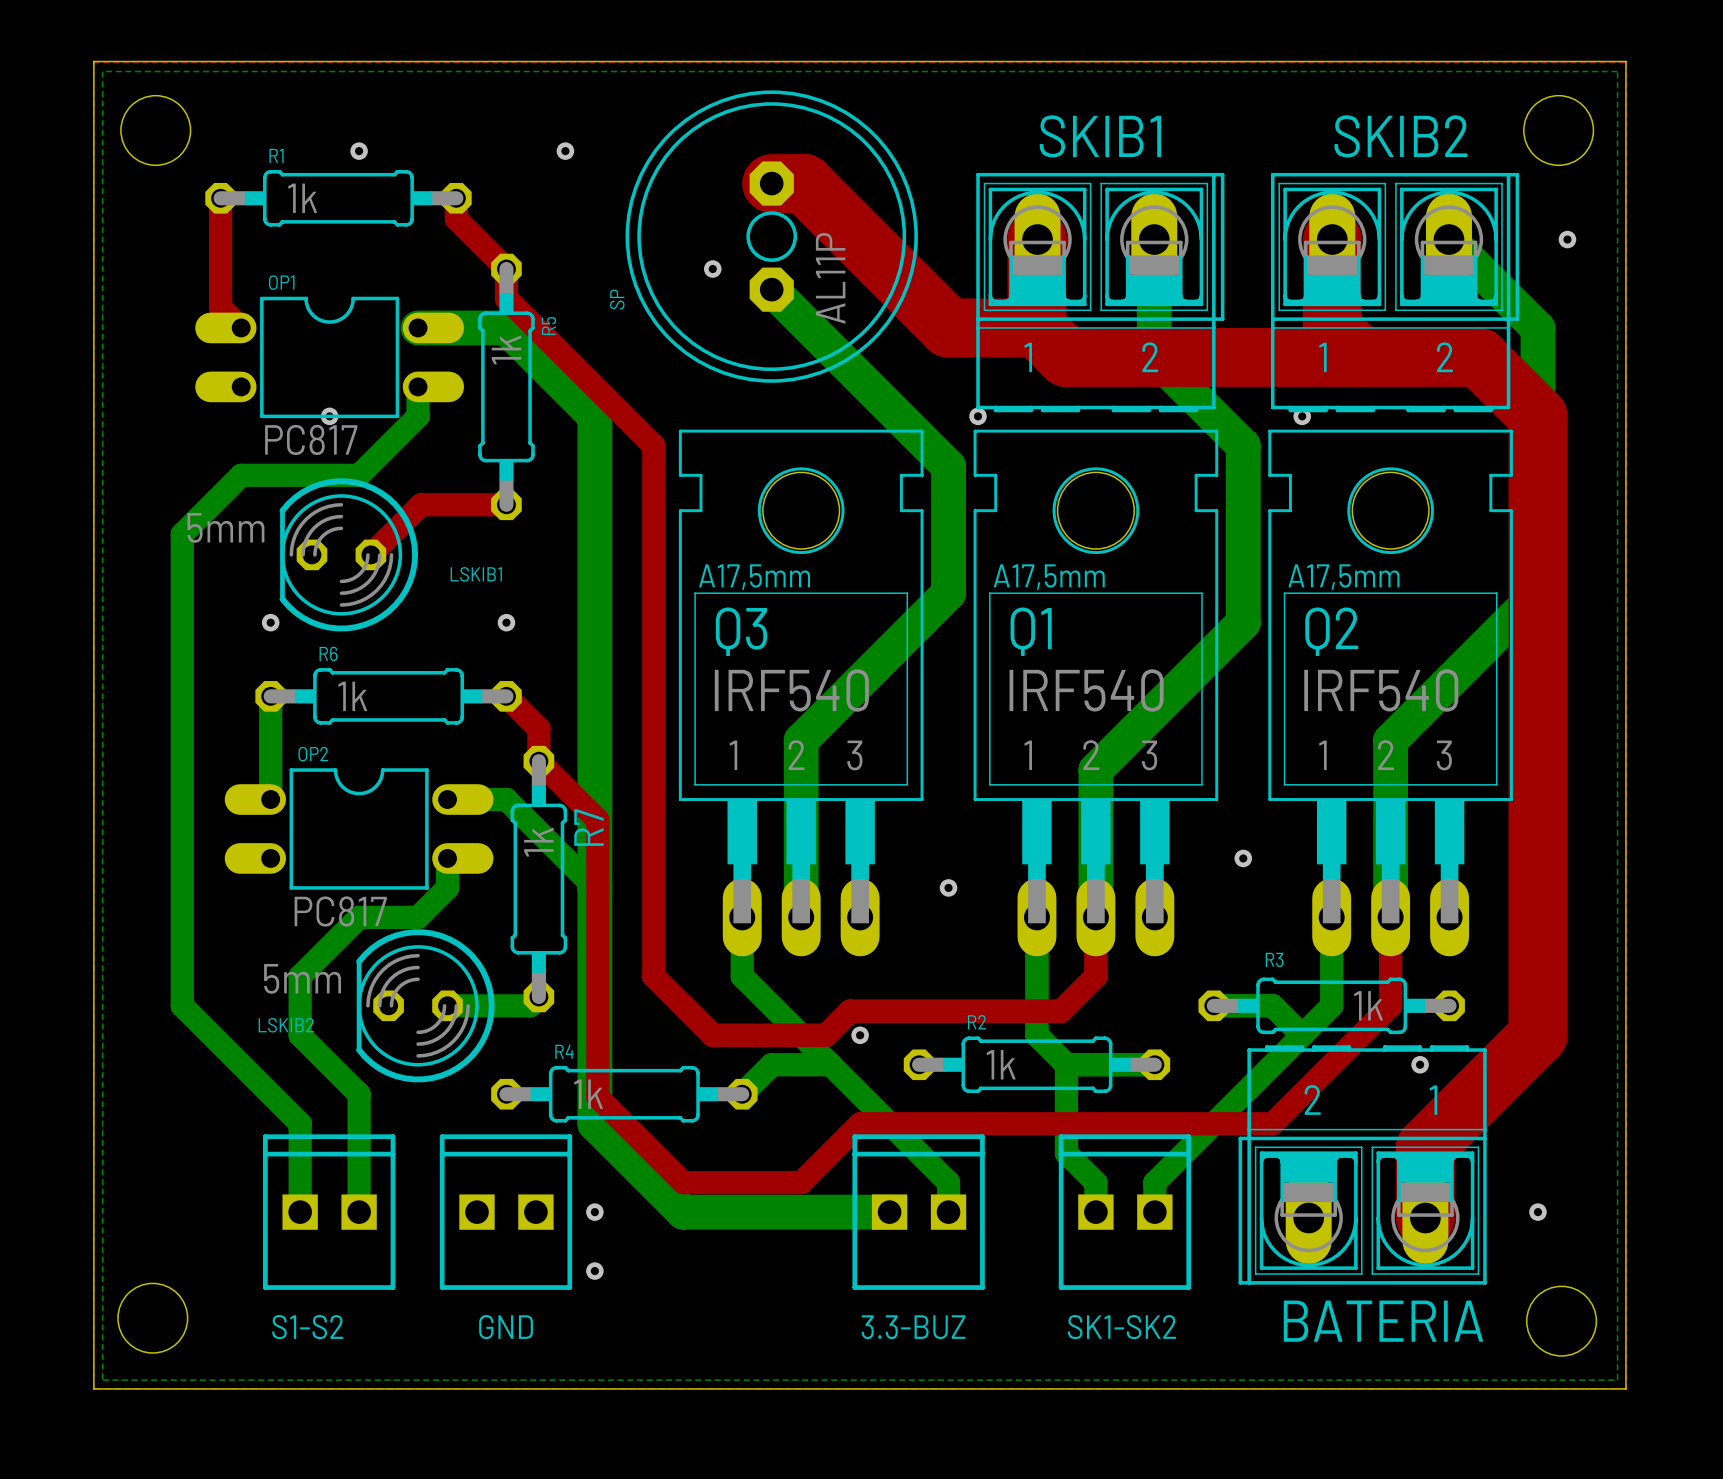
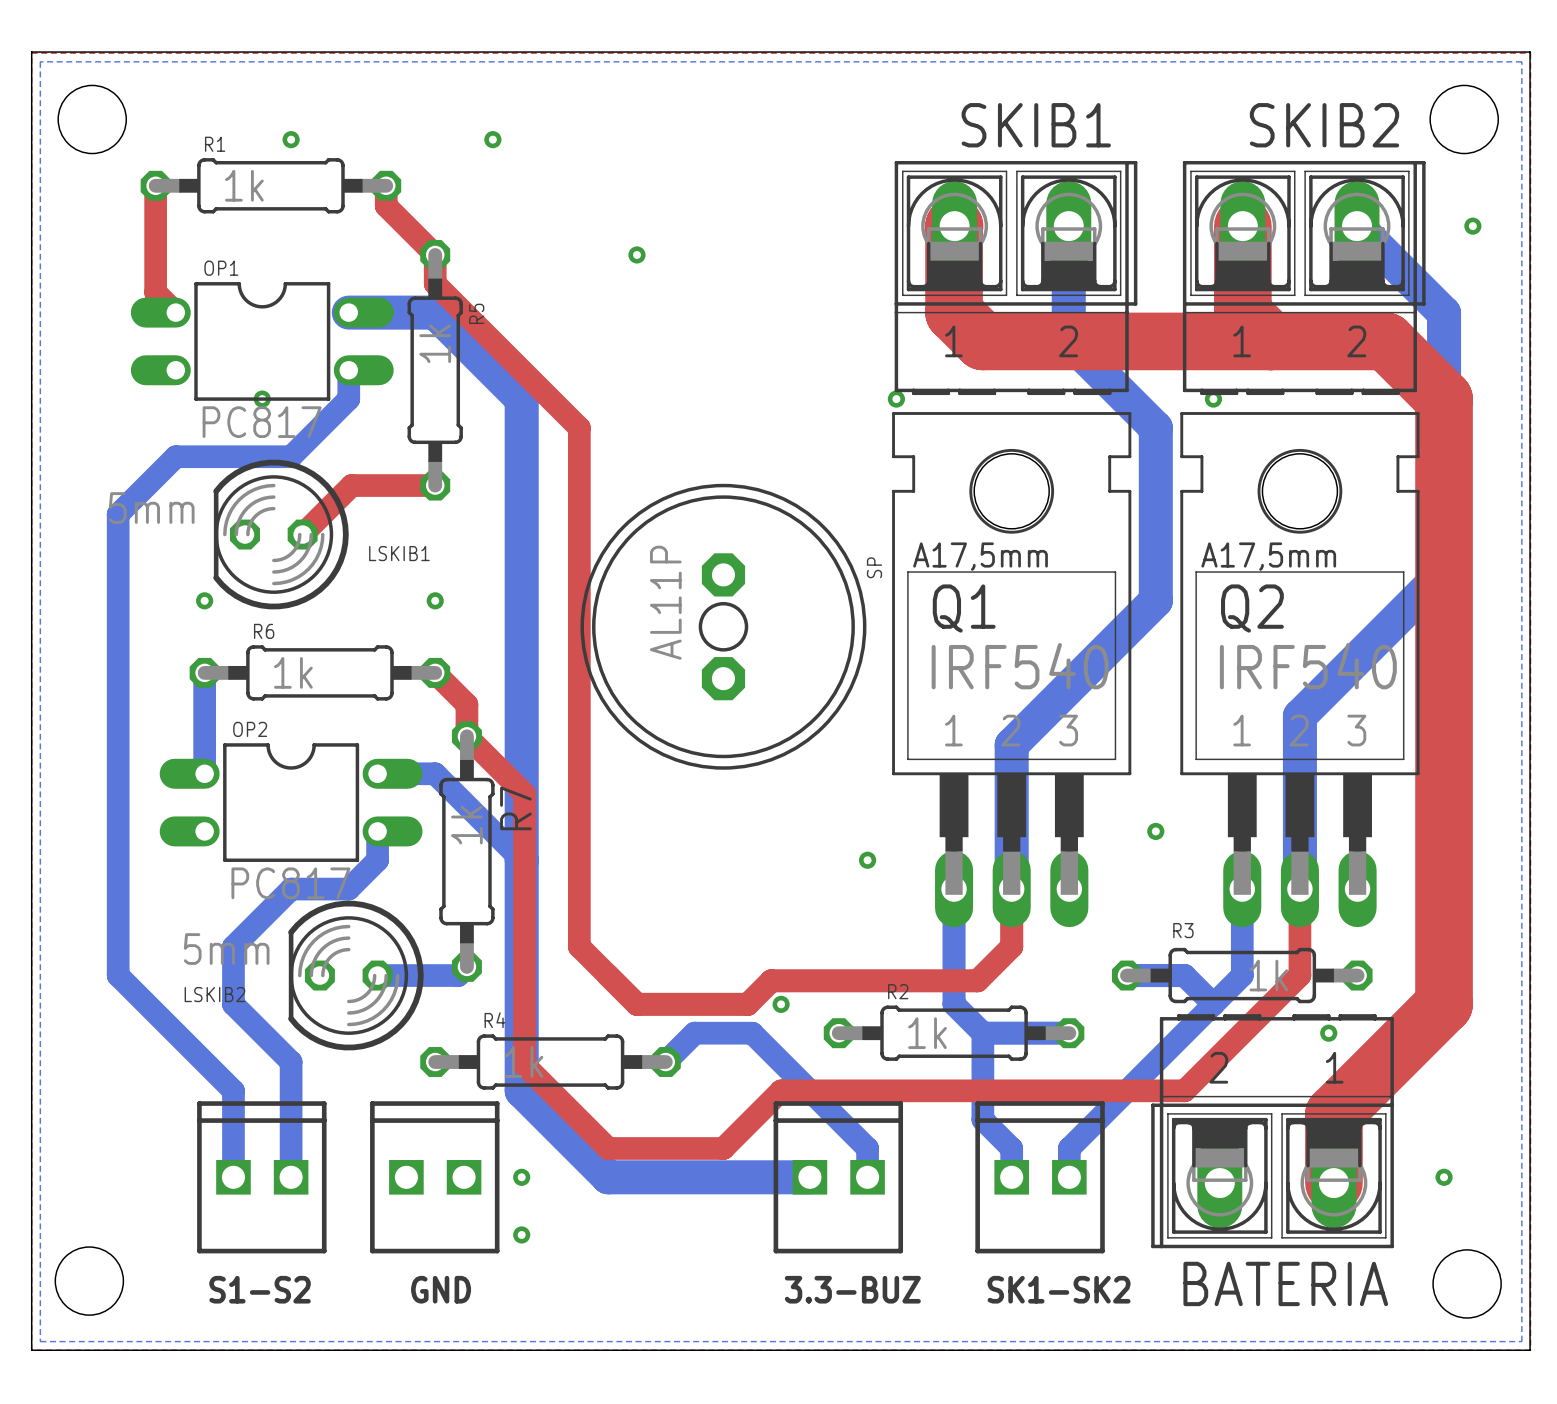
top track: (771, 183) (804, 183) (948, 327) (1036, 327) -> none
SP position: (771, 236) -> (723, 626)
SP value position: AL11P (830, 278) -> AL11P (665, 602)
bottom track: (771, 289) (948, 466) (948, 593) (801, 740) (801, 917) -> none
SP name position: SP (617, 299) -> SP (874, 567)
Q3: IRF540 (801, 692) -> none
bottom track: (742, 917) (742, 976) (830, 1064) -> none

